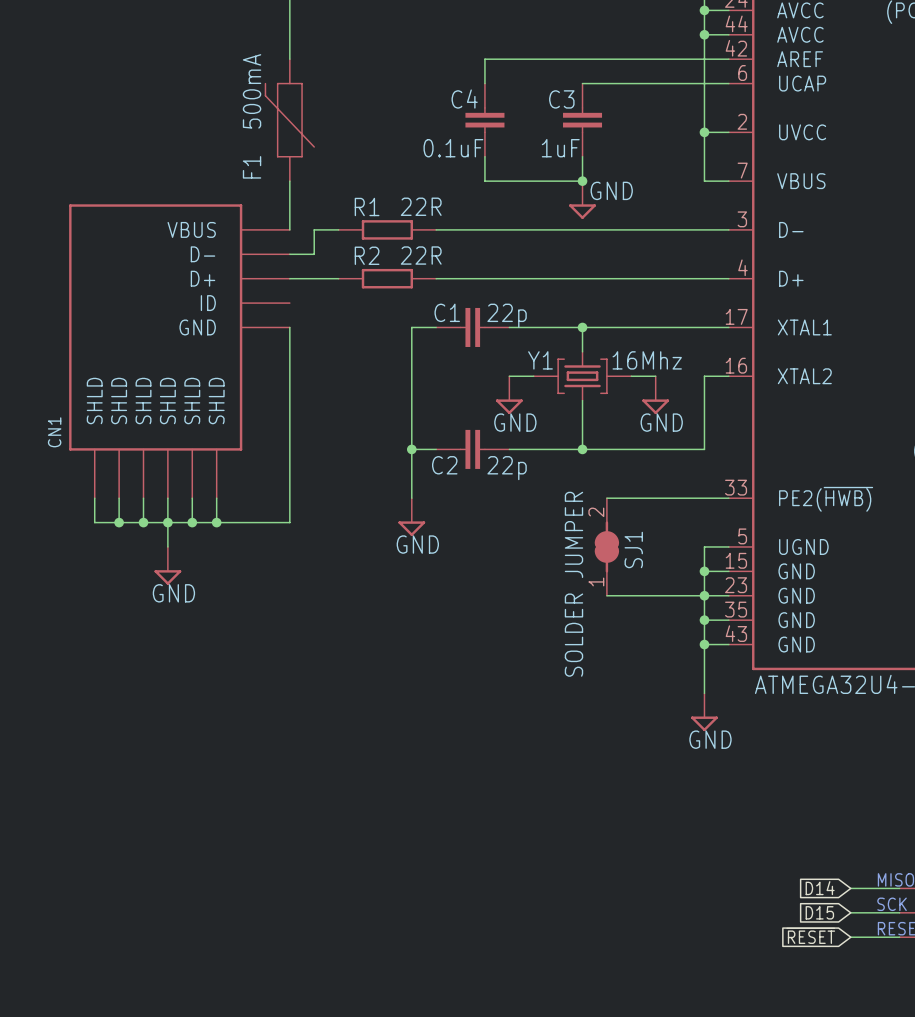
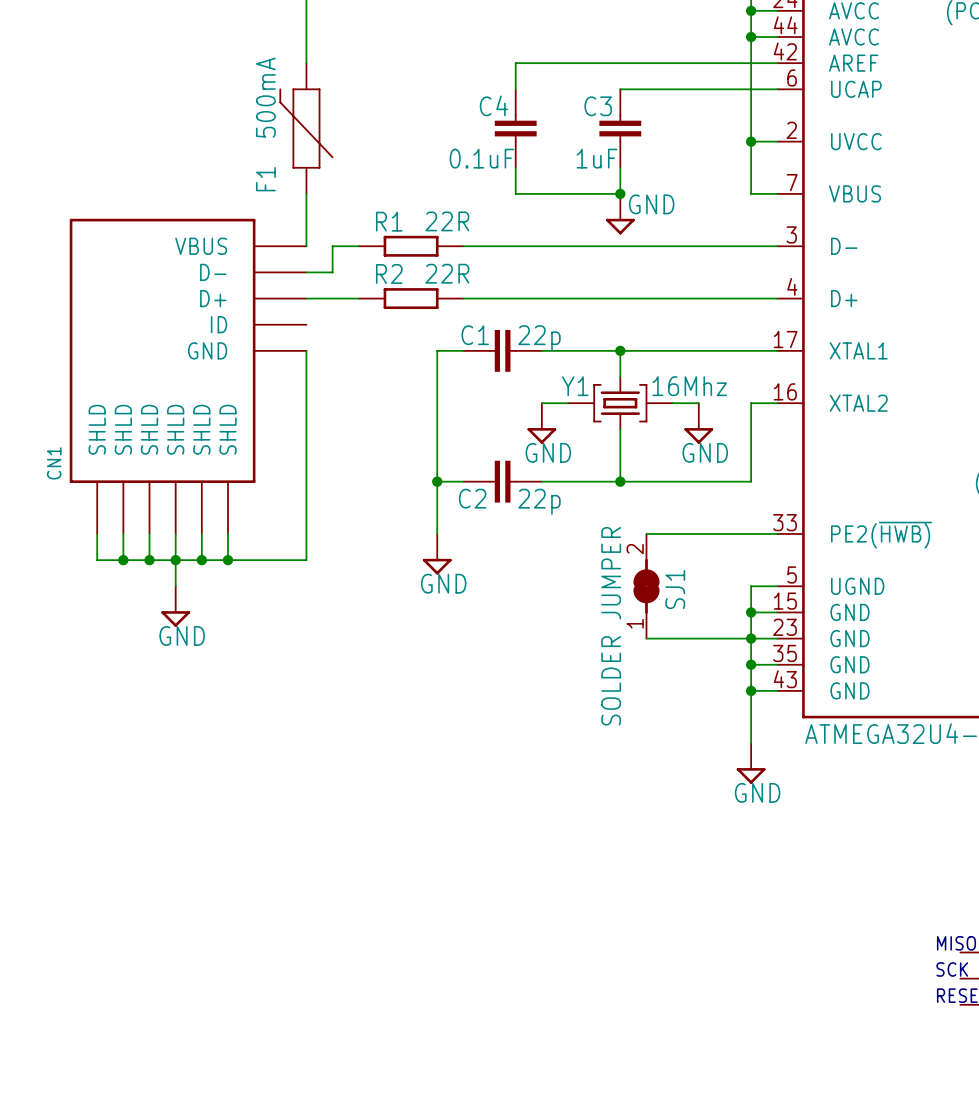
global label: D14 (820, 888) -> none
wire: (850, 888) (899, 888) -> none
global label: D15 (819, 912) -> none
wire: (850, 912) (899, 912) -> none
global label: ~{RESET} (810, 935) -> none
wire: (850, 937) (899, 937) -> none

